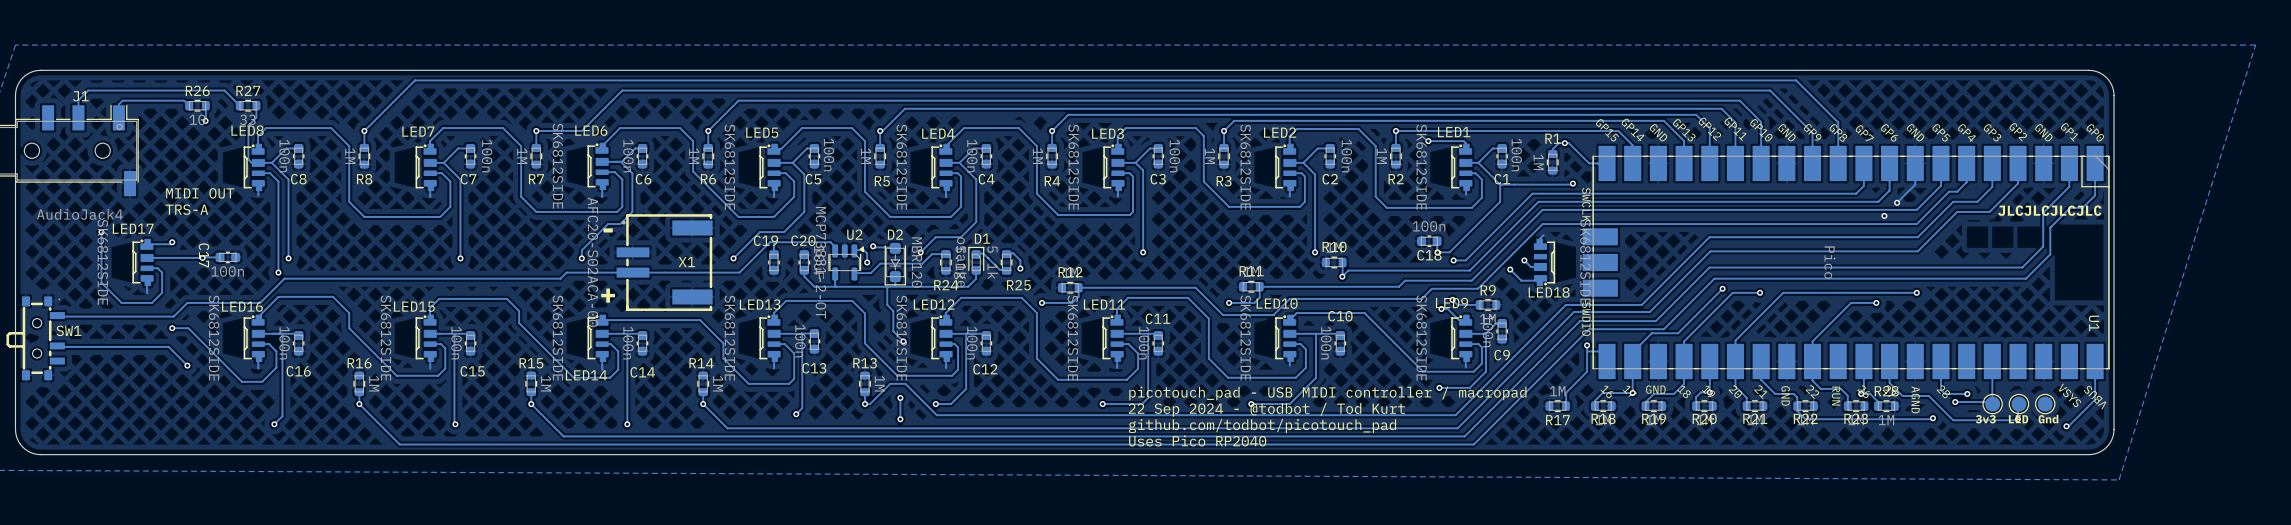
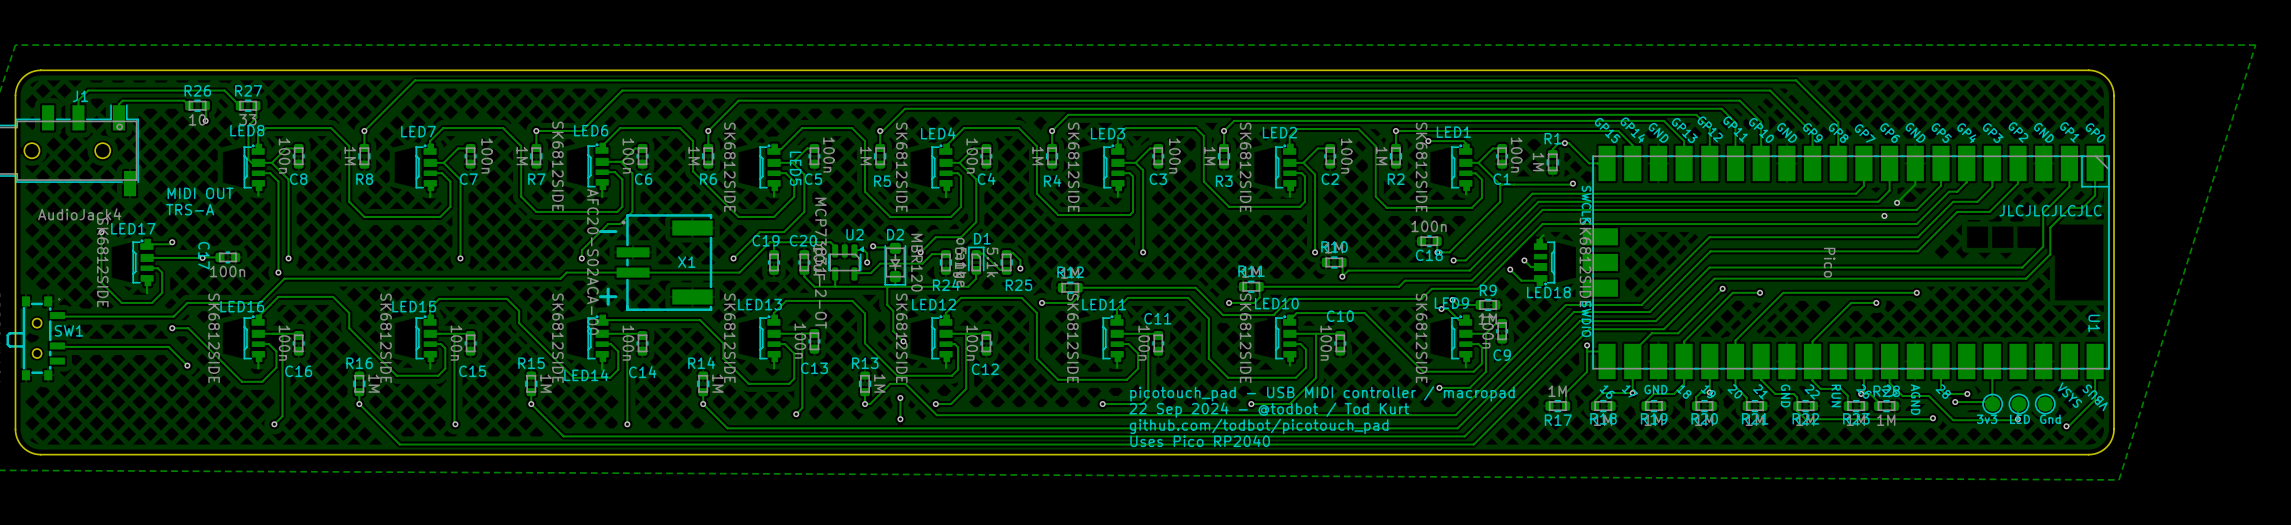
LED5 name rotation: 0° (762, 132) -> 90° clockwise (795, 168)
LED5 name position: LED5 (762, 132) -> LED5 (795, 168)

